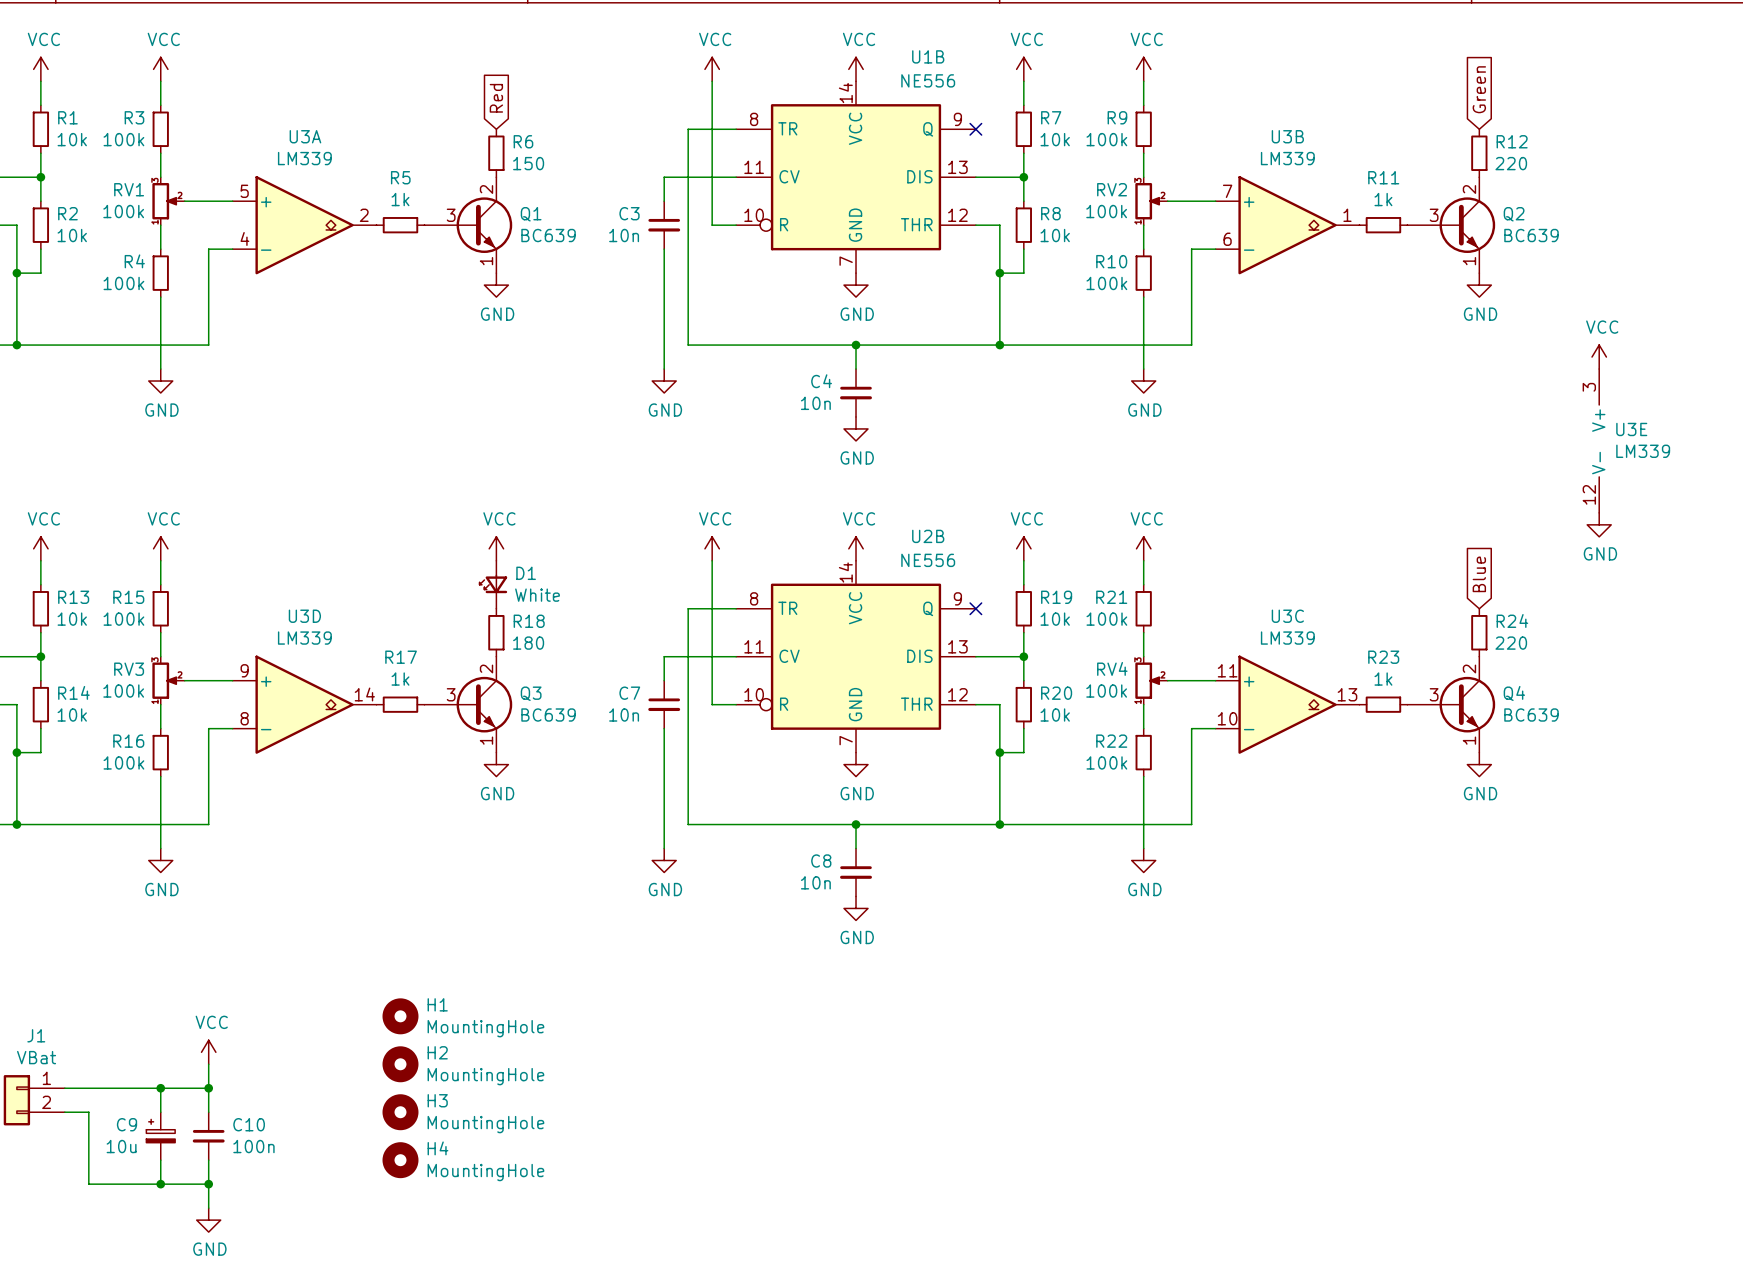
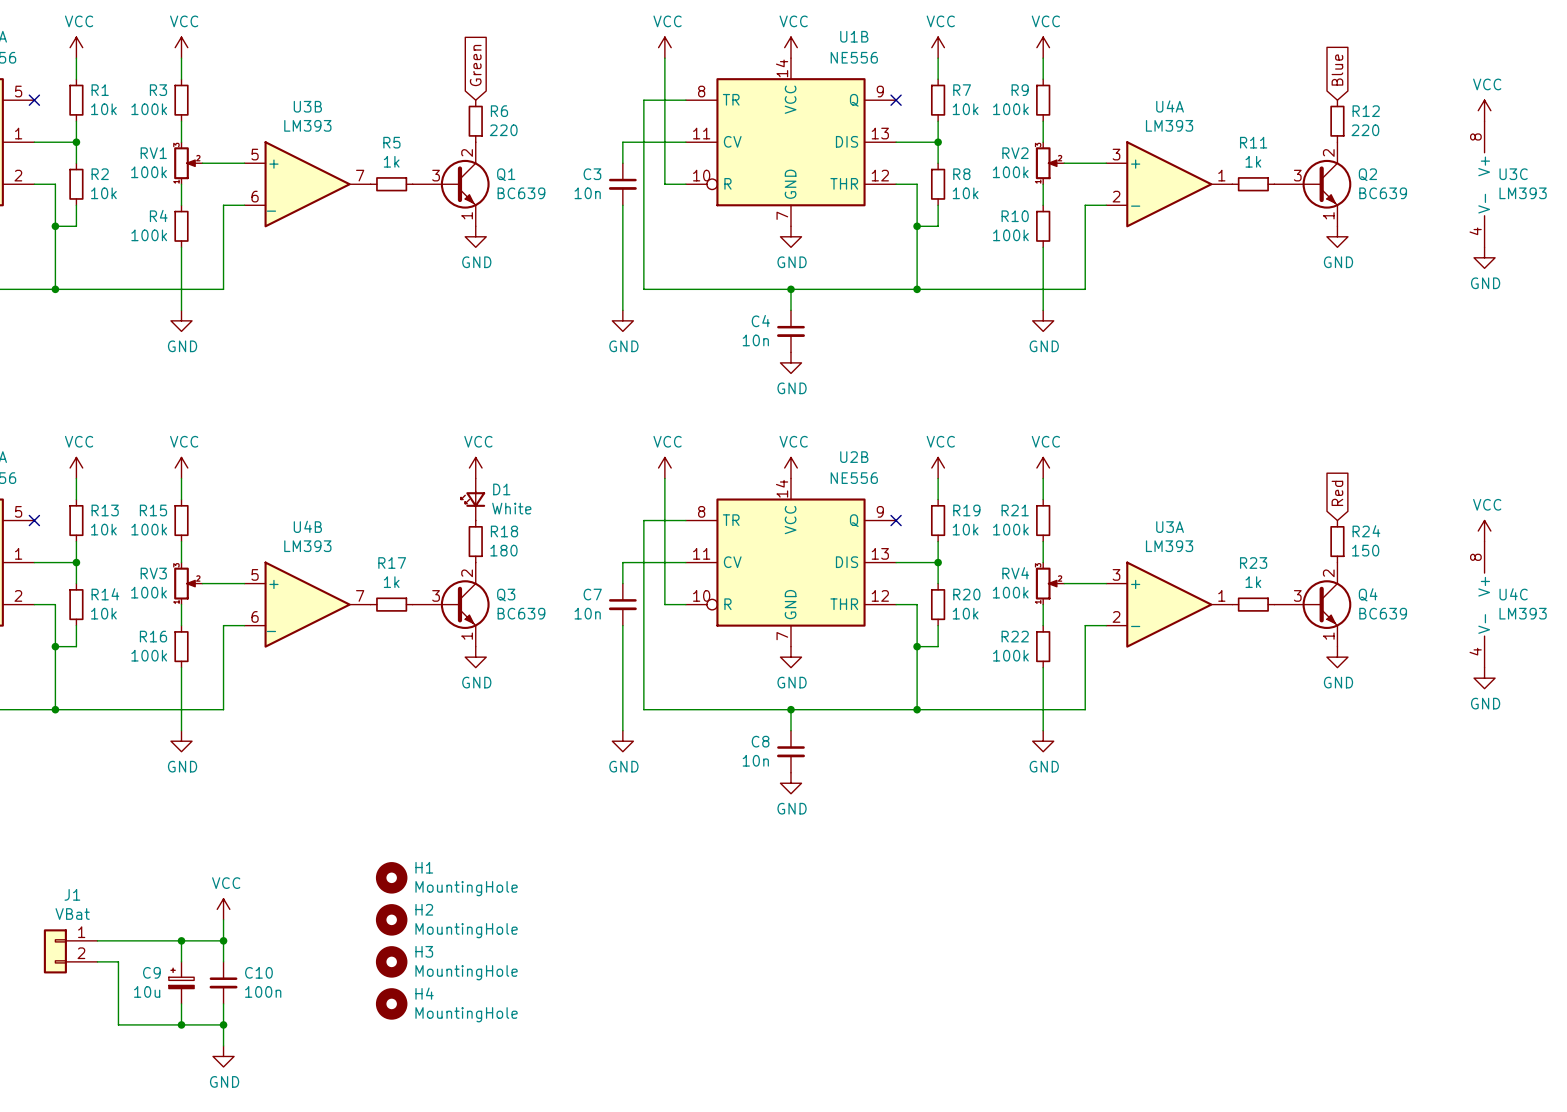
global label: Green (1479, 89) -> Blue (1337, 70)
global label: Red (496, 98) -> Green (475, 65)
power symbol: none -> VCC (1484, 110)
U3A value: LM339 (304, 158) -> LM393 (1169, 546)
U3B value: LM339 (1287, 158) -> LM393 (307, 125)
R6 value: 150 (528, 163) -> 220 (503, 130)
U3A symbol: [232, 176, 377, 275] -> [1106, 561, 1233, 648]
U3B symbol: [1215, 176, 1360, 275] -> [244, 141, 371, 228]
U4A: none -> LM393 (1169, 184)
power symbol: none -> GND (1484, 257)
power symbol: VCC (1599, 357) -> none
U3E: LM339 (1599, 440) -> none
power symbol: GND (1599, 524) -> none
global label: Blue (1479, 574) -> Red (1337, 493)
U3C name position: U3C (1287, 616) -> U3C (1513, 174)
power symbol: none -> VCC (1484, 531)
U3C value: LM339 (1287, 638) -> LM393 (1523, 193)
R24 value: 220 (1511, 643) -> 150 (1365, 550)
U3C symbol: [1215, 655, 1360, 754] -> [1484, 121, 1485, 248]
U3D: LM339 (304, 704) -> none
U4B: none -> LM393 (307, 604)
U4C: none -> LM393 (1484, 604)
power symbol: none -> GND (1484, 678)

